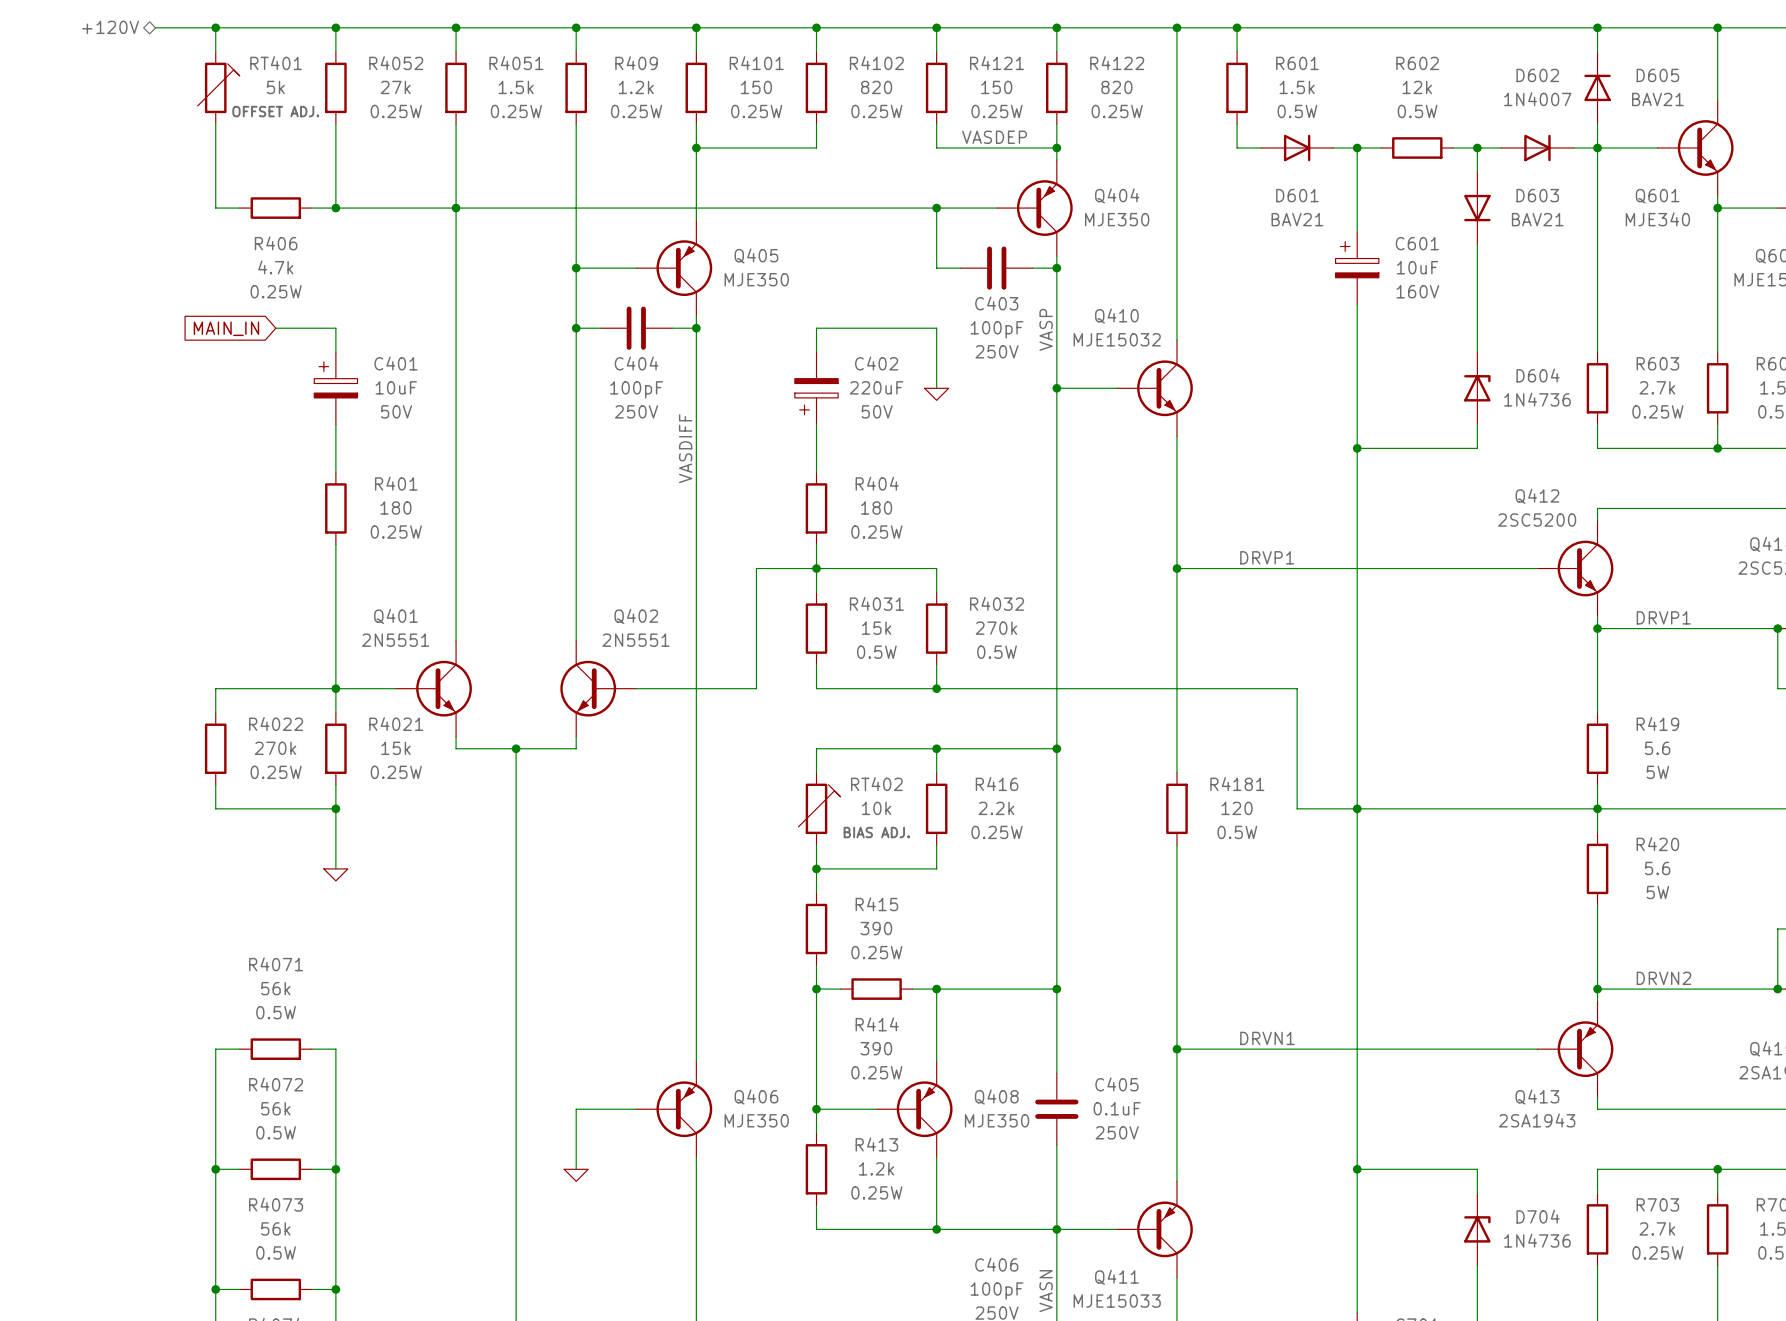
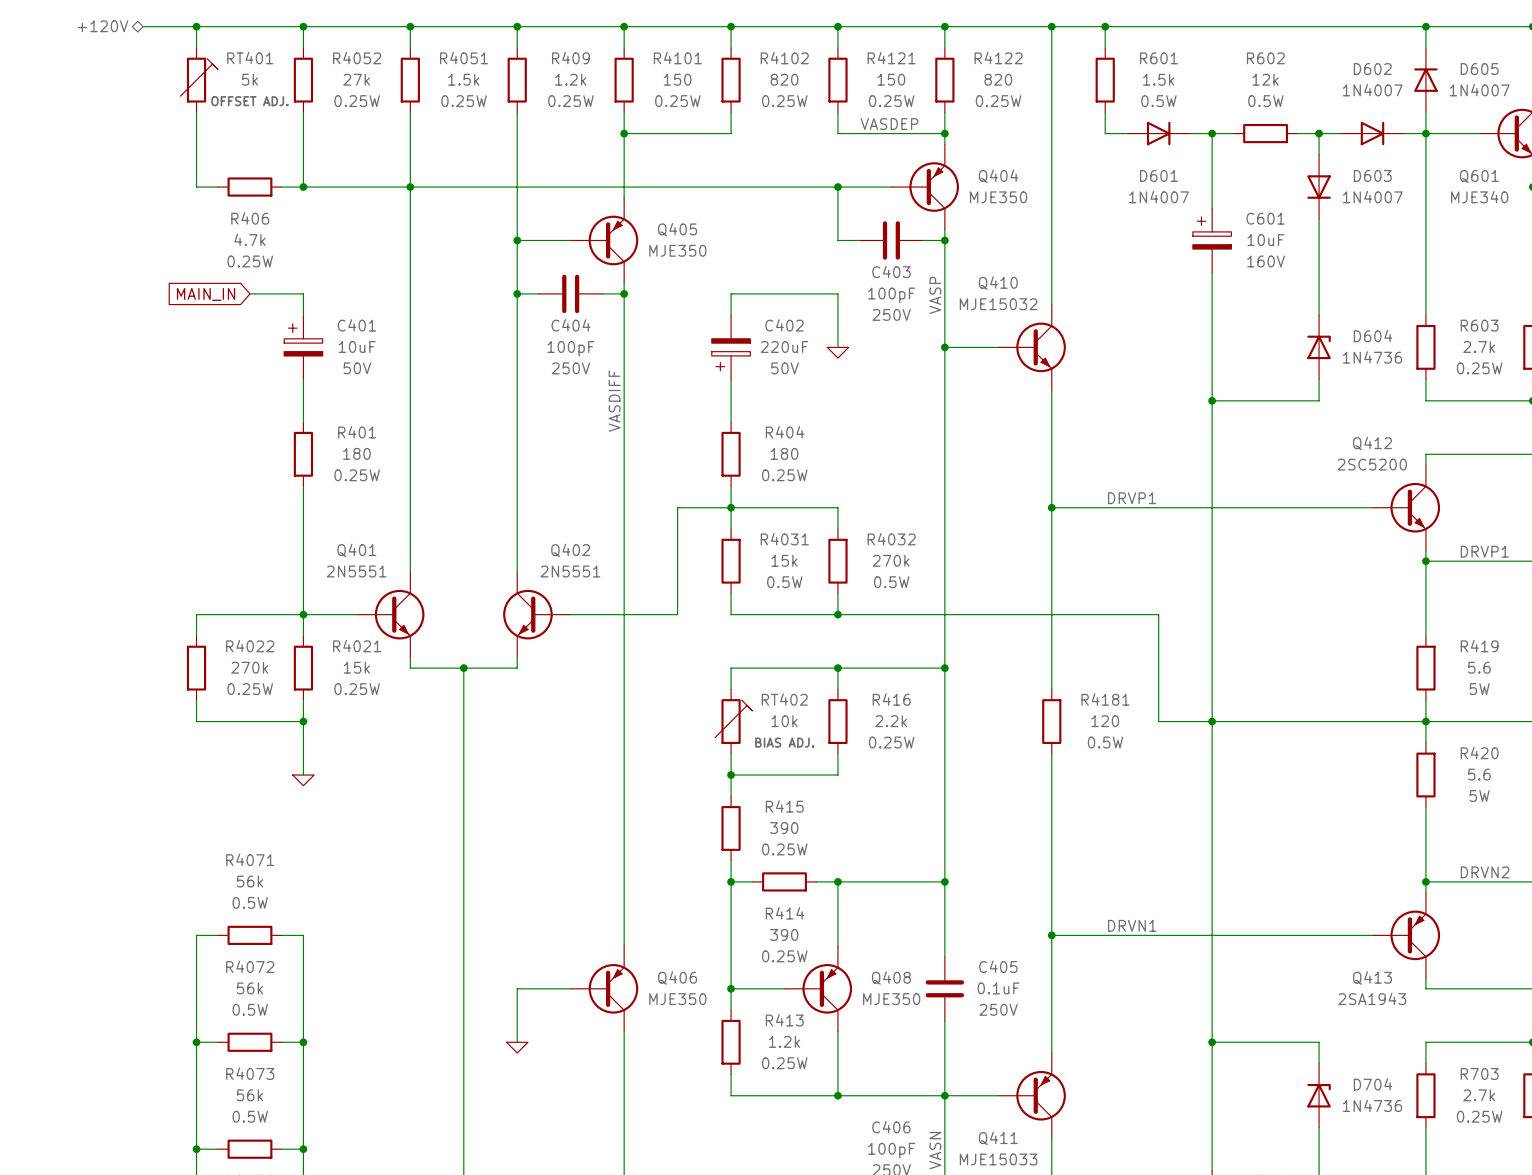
D605 value: BAV21 (1657, 99) -> 1N4007 (1479, 90)
D601 value: BAV21 (1297, 219) -> 1N4007 (1158, 197)
D603 value: BAV21 (1537, 219) -> 1N4007 (1372, 197)

